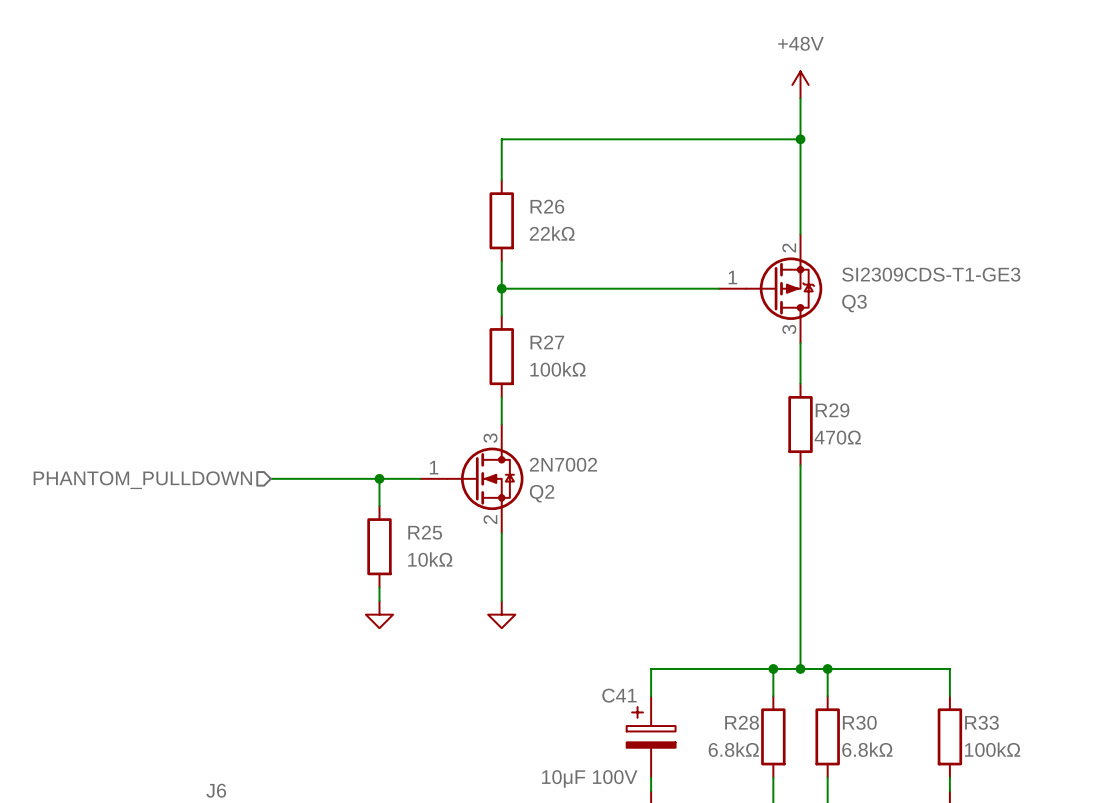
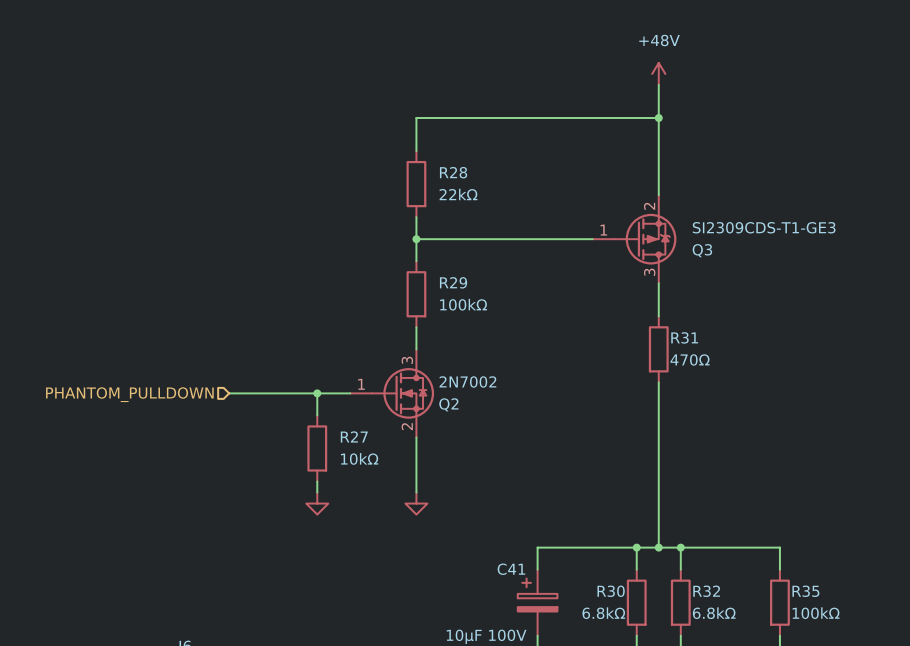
R26 name: R26 (547, 206) -> R28 (453, 172)
R27 name: R27 (547, 342) -> R29 (453, 282)
R29 name: R29 (832, 410) -> R31 (684, 337)
R25 name: R25 (425, 532) -> R27 (354, 436)
R28 name: R28 (742, 722) -> R30 (611, 591)
R30 name: R30 (859, 722) -> R32 (706, 591)
R33 name: R33 (981, 722) -> R35 (805, 591)

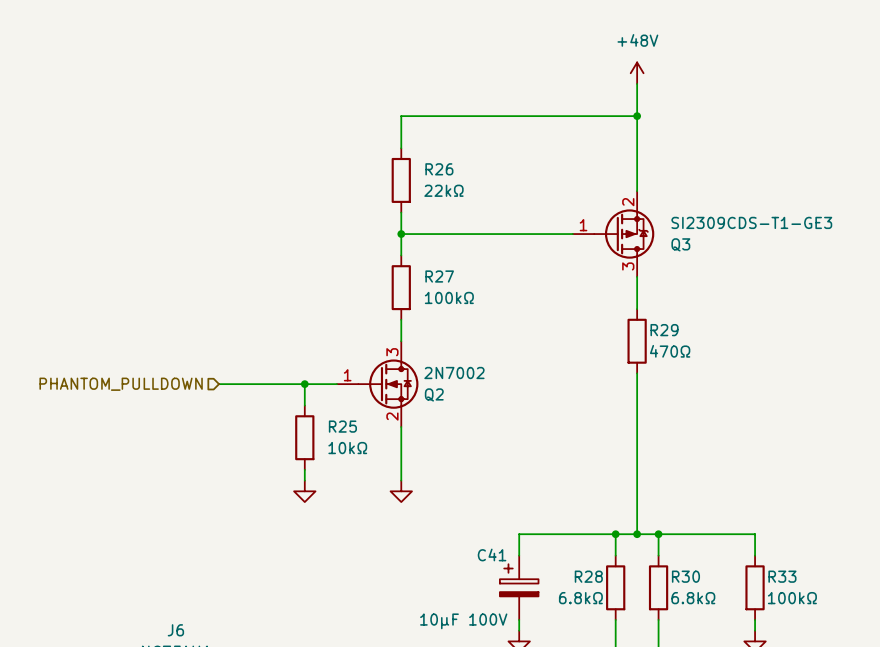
R28 name: R28 (453, 172) -> R26 (439, 169)
R29 name: R29 (453, 282) -> R27 (439, 276)
R31 name: R31 (684, 337) -> R29 (664, 330)
R27 name: R27 (354, 436) -> R25 (342, 426)
R30 name: R30 (611, 591) -> R28 (588, 576)
R32 name: R32 (706, 591) -> R30 (685, 576)
R35 name: R35 (805, 591) -> R33 (782, 576)

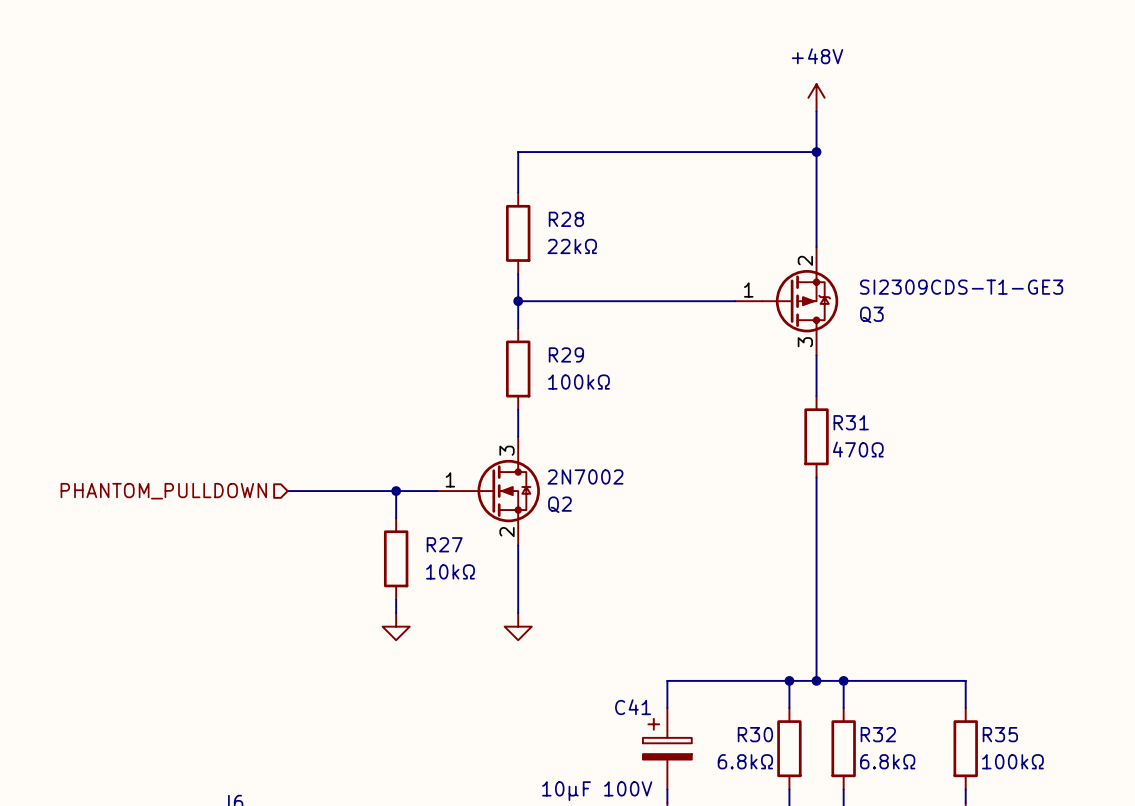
R26 name: R26 (439, 169) -> R28 (566, 219)
R27 name: R27 (439, 276) -> R29 (566, 354)
R29 name: R29 (664, 330) -> R31 (851, 422)
R25 name: R25 (342, 426) -> R27 (444, 544)
R28 name: R28 (588, 576) -> R30 (755, 734)
R30 name: R30 (685, 576) -> R32 (878, 734)
R33 name: R33 (782, 576) -> R35 (1000, 734)

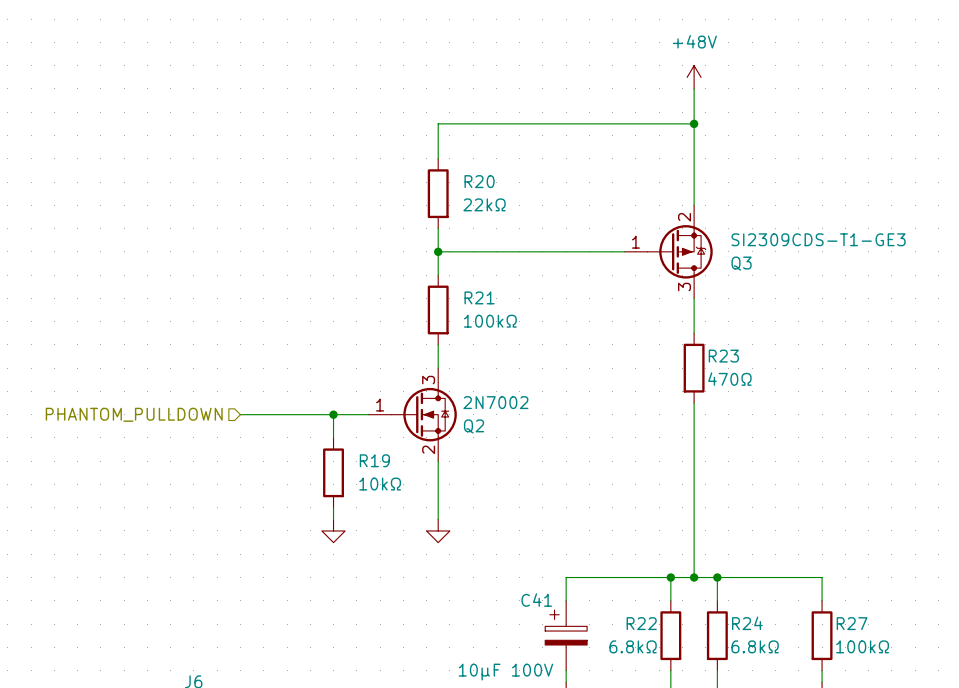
R28 name: R28 (566, 219) -> R20 (479, 181)
R29 name: R29 (566, 354) -> R21 (479, 297)
R31 name: R31 (851, 422) -> R23 (723, 356)
R27 name: R27 (444, 544) -> R19 (374, 460)
R30 name: R30 (755, 734) -> R22 (641, 623)
R32 name: R32 (878, 734) -> R24 (747, 623)
R35 name: R35 (1000, 734) -> R27 (852, 623)

